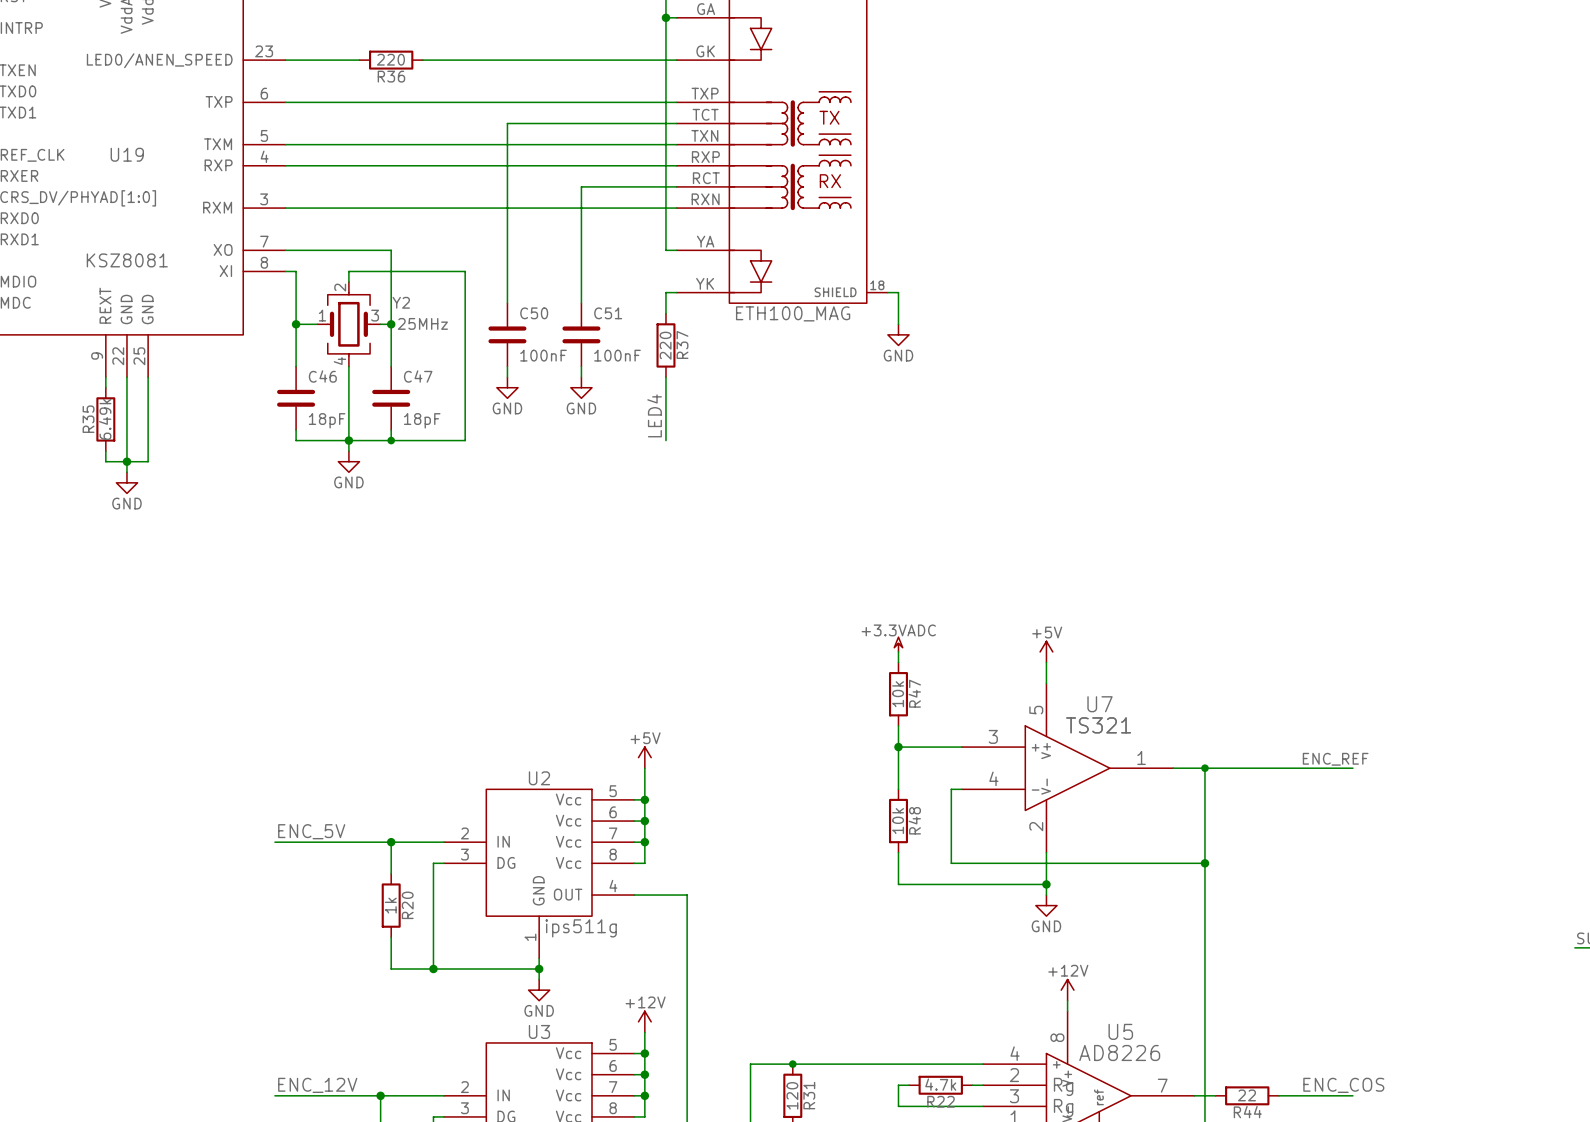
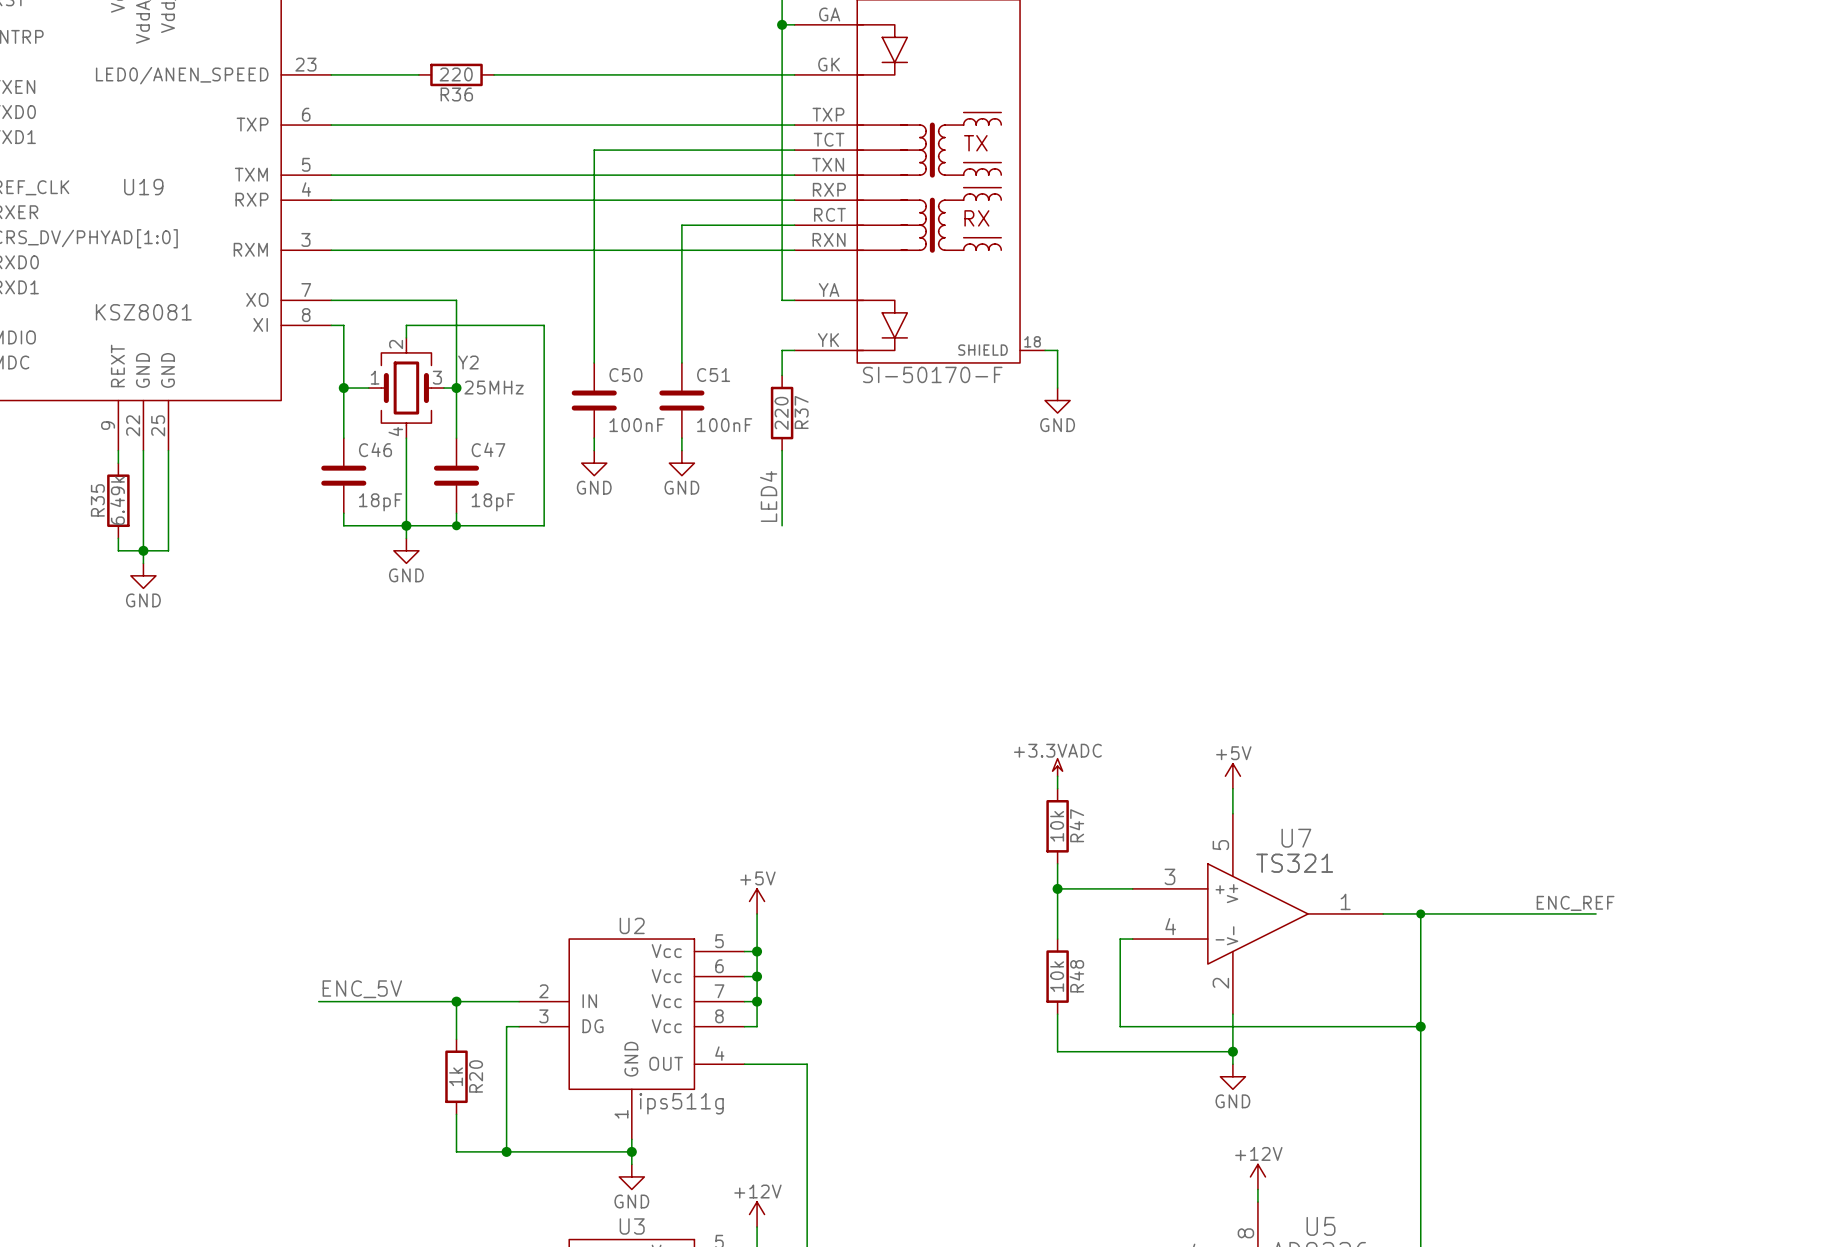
part value: ETH100_MAG (793, 313) -> SI-50170-F (932, 374)

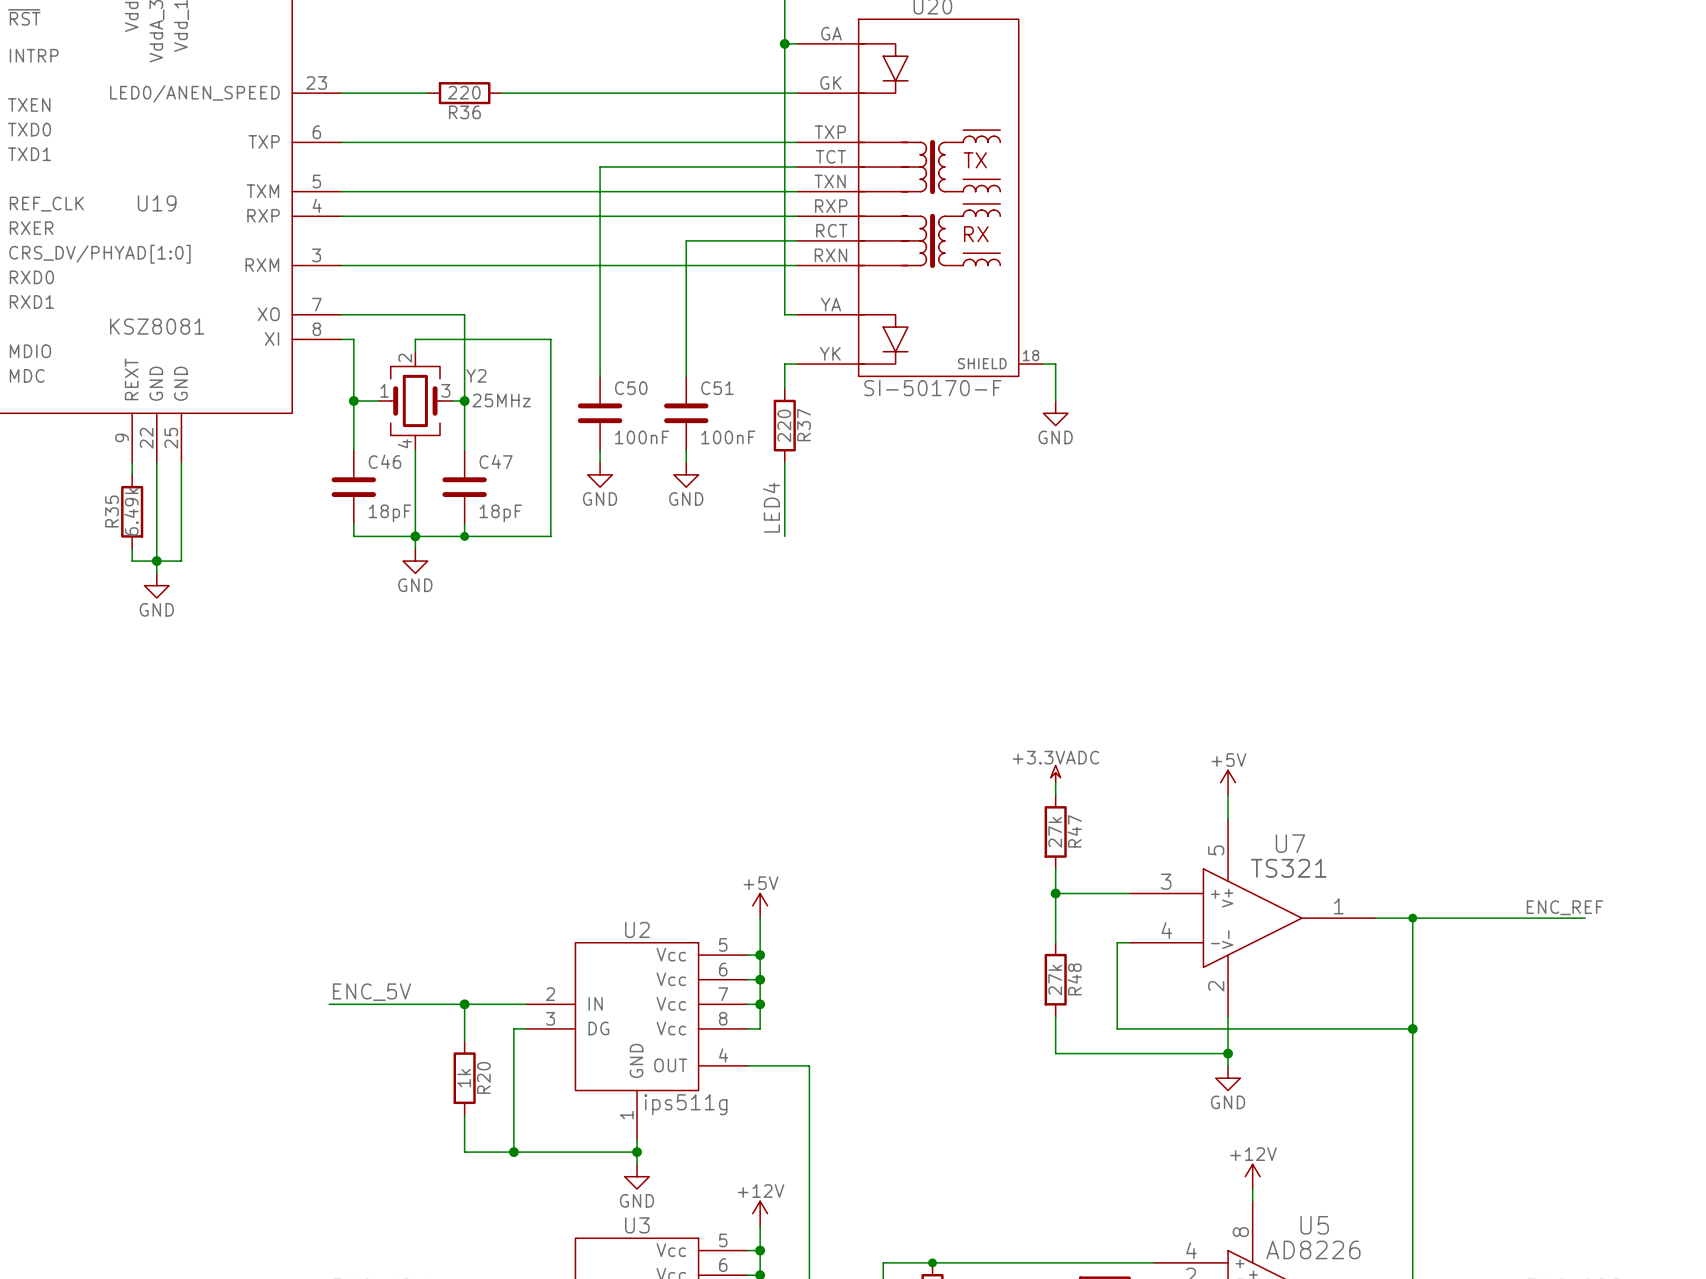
R47 value: 10k (1057, 826) -> 27k (1055, 832)
R48 value: 10k (1057, 976) -> 27k (1055, 979)

